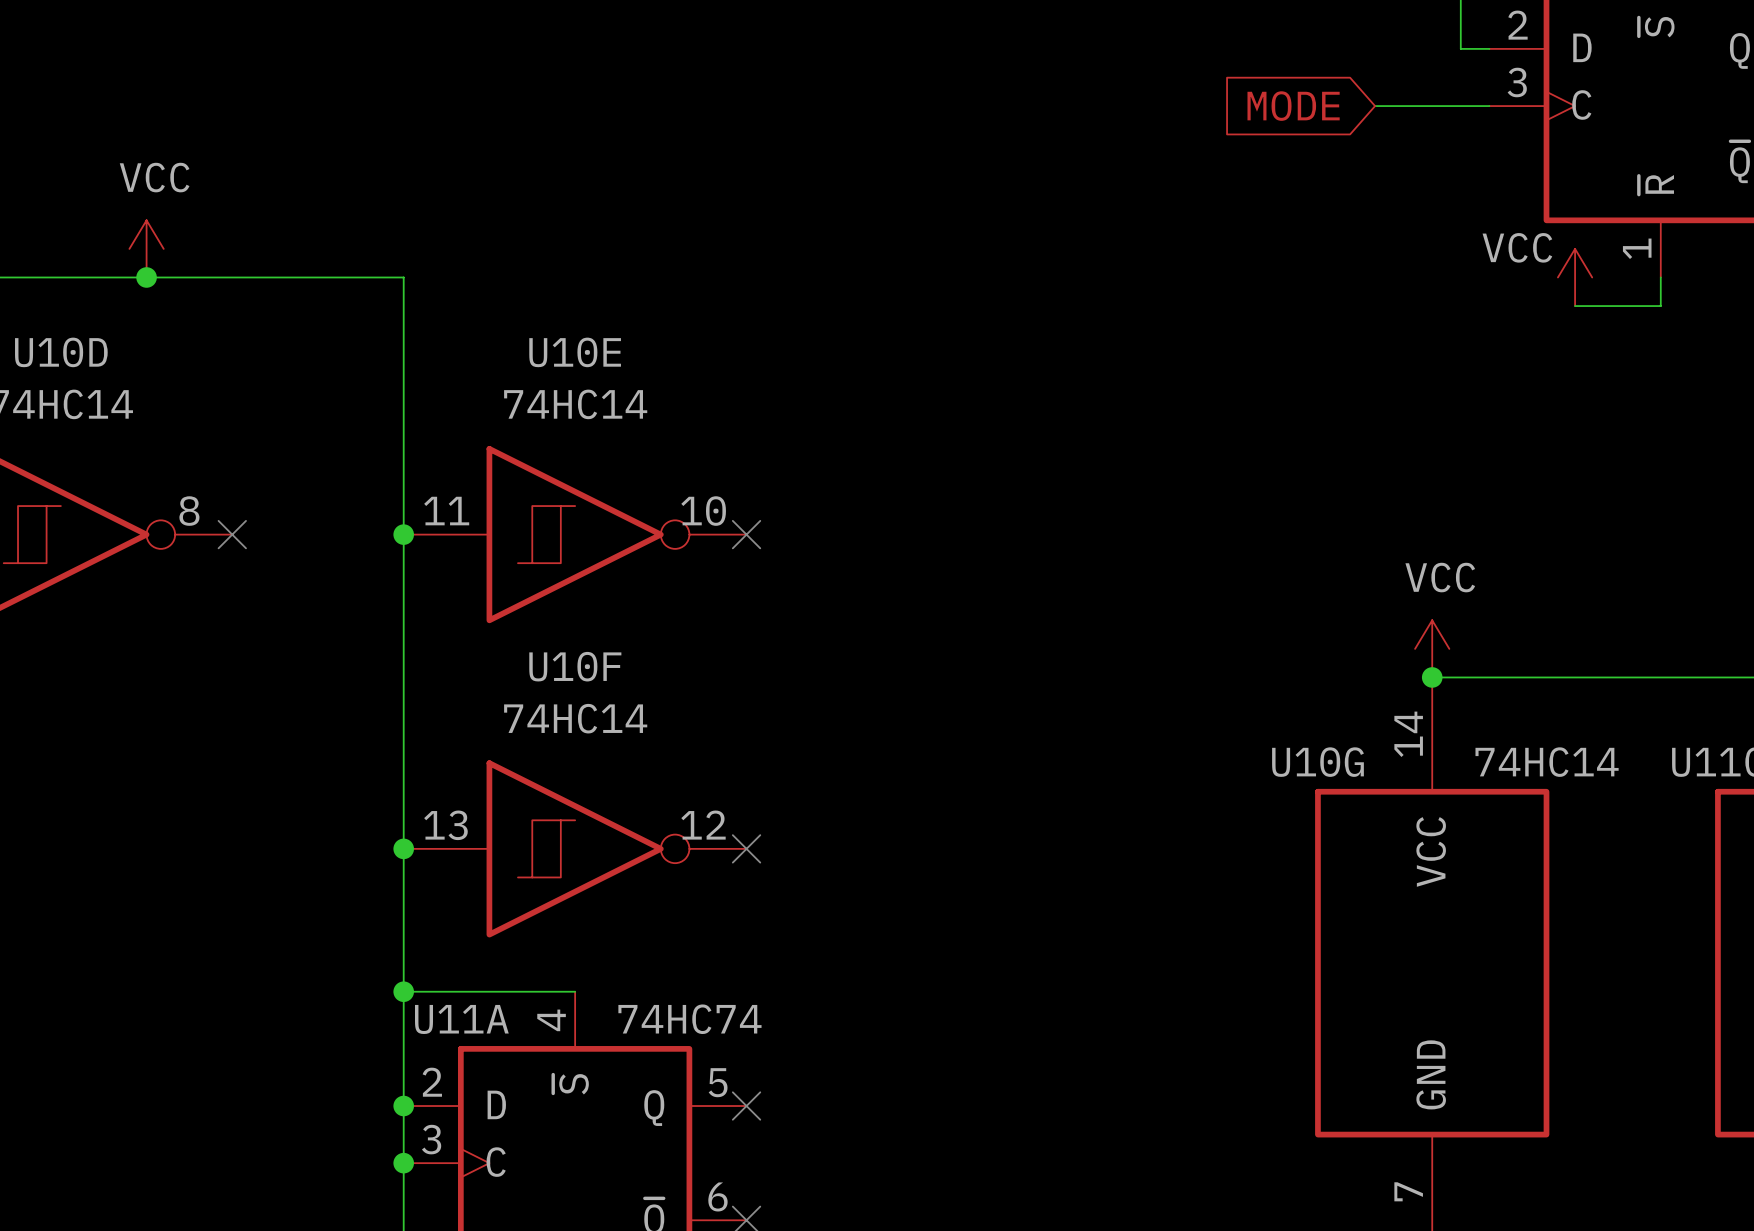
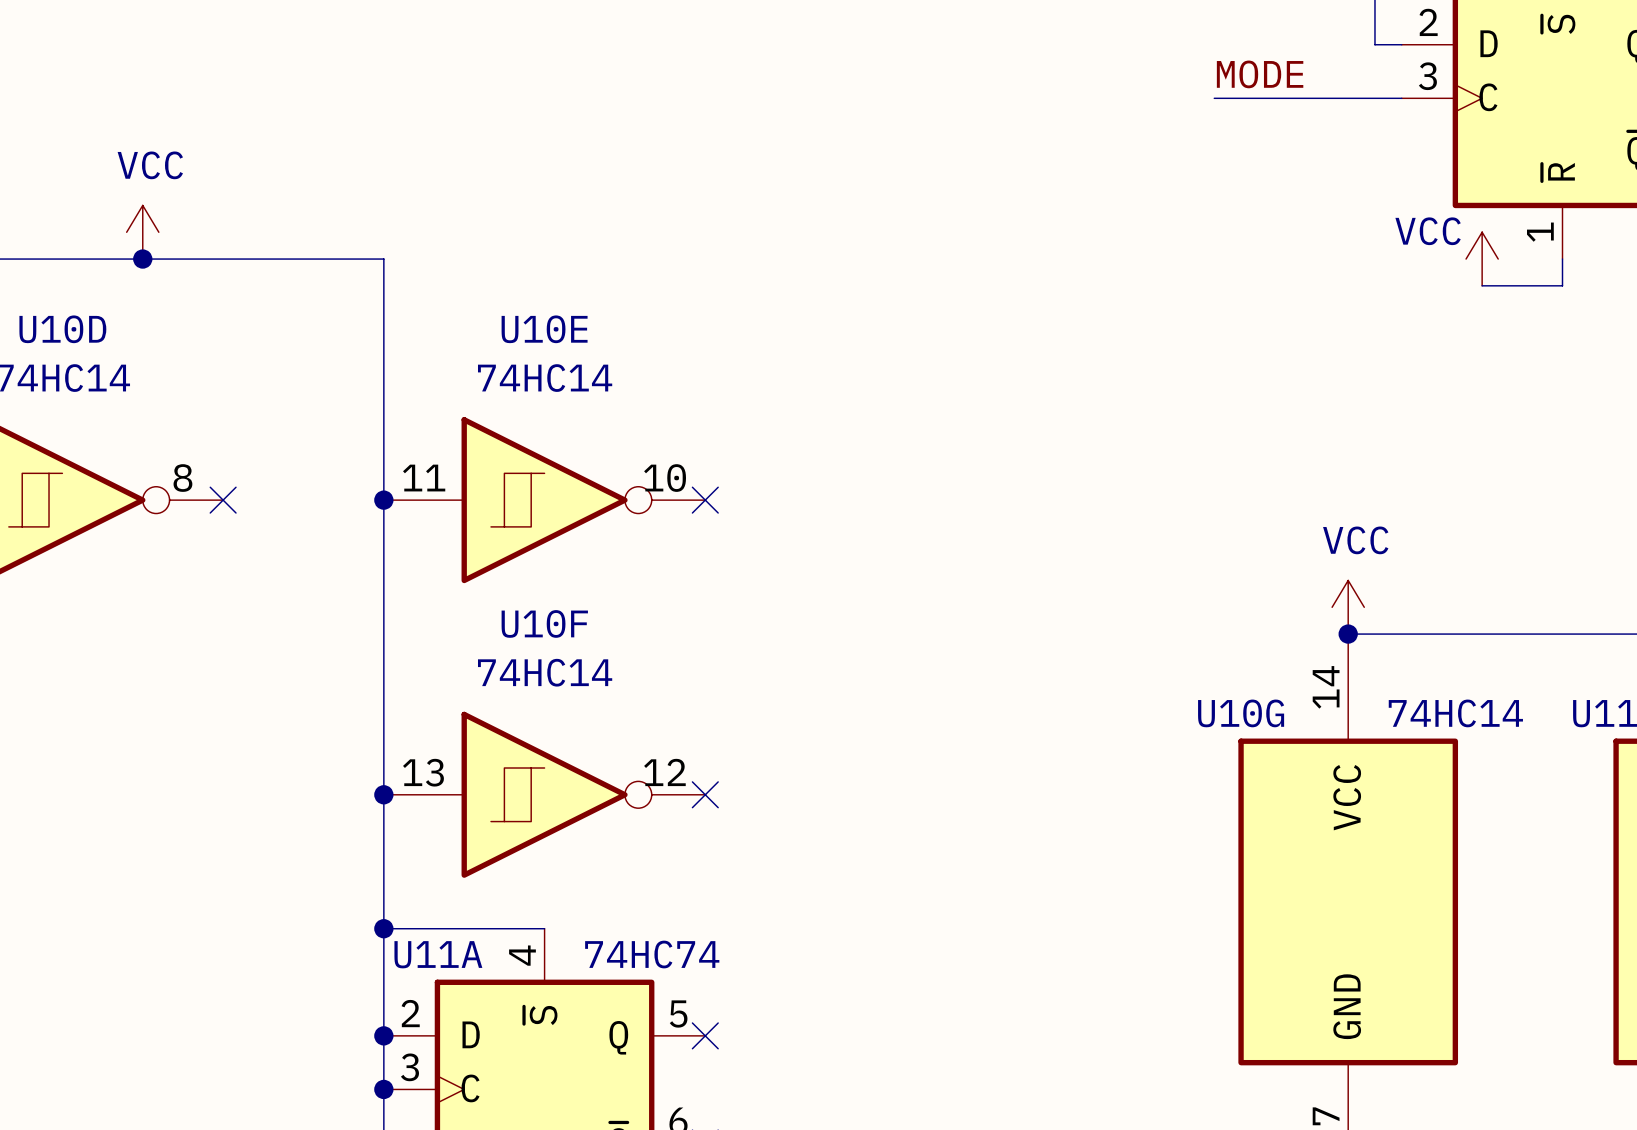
label: none -> MODE (1260, 74)
wire: none -> (1214, 98) (1294, 98)
global label: MODE (1293, 106) -> none

